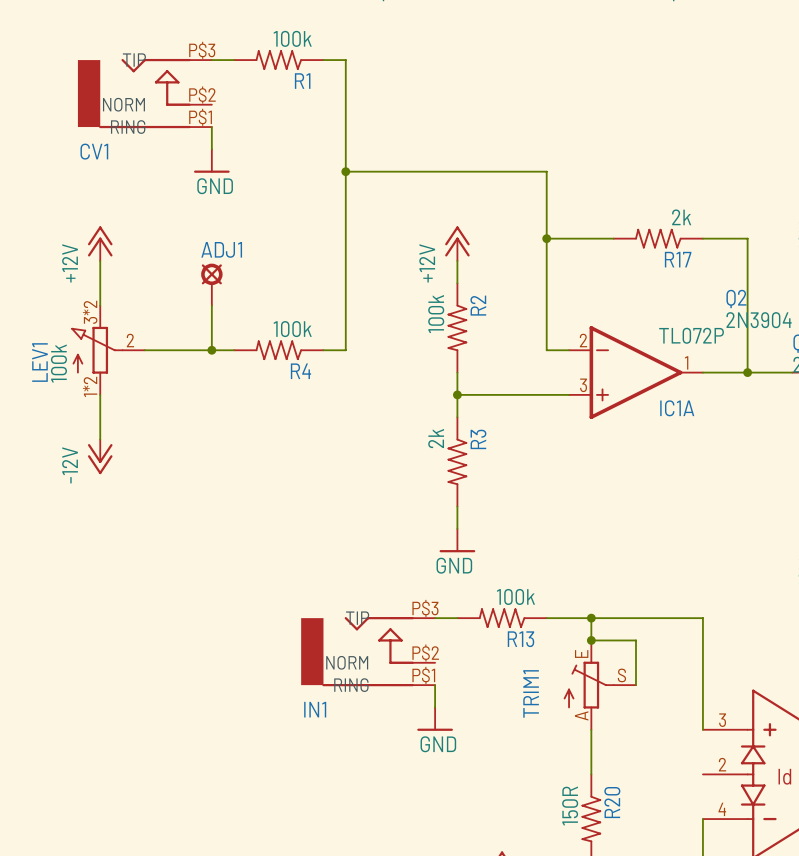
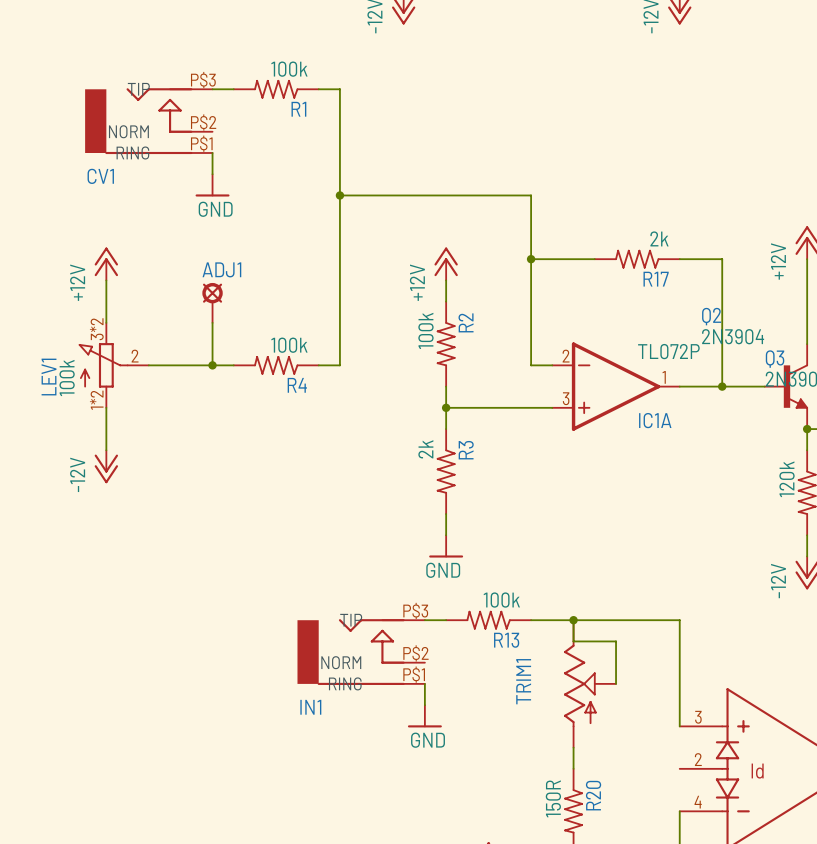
TRIM1 symbol: [563, 640, 637, 730] -> [564, 620, 617, 748]
junction: (591, 640) -> none

